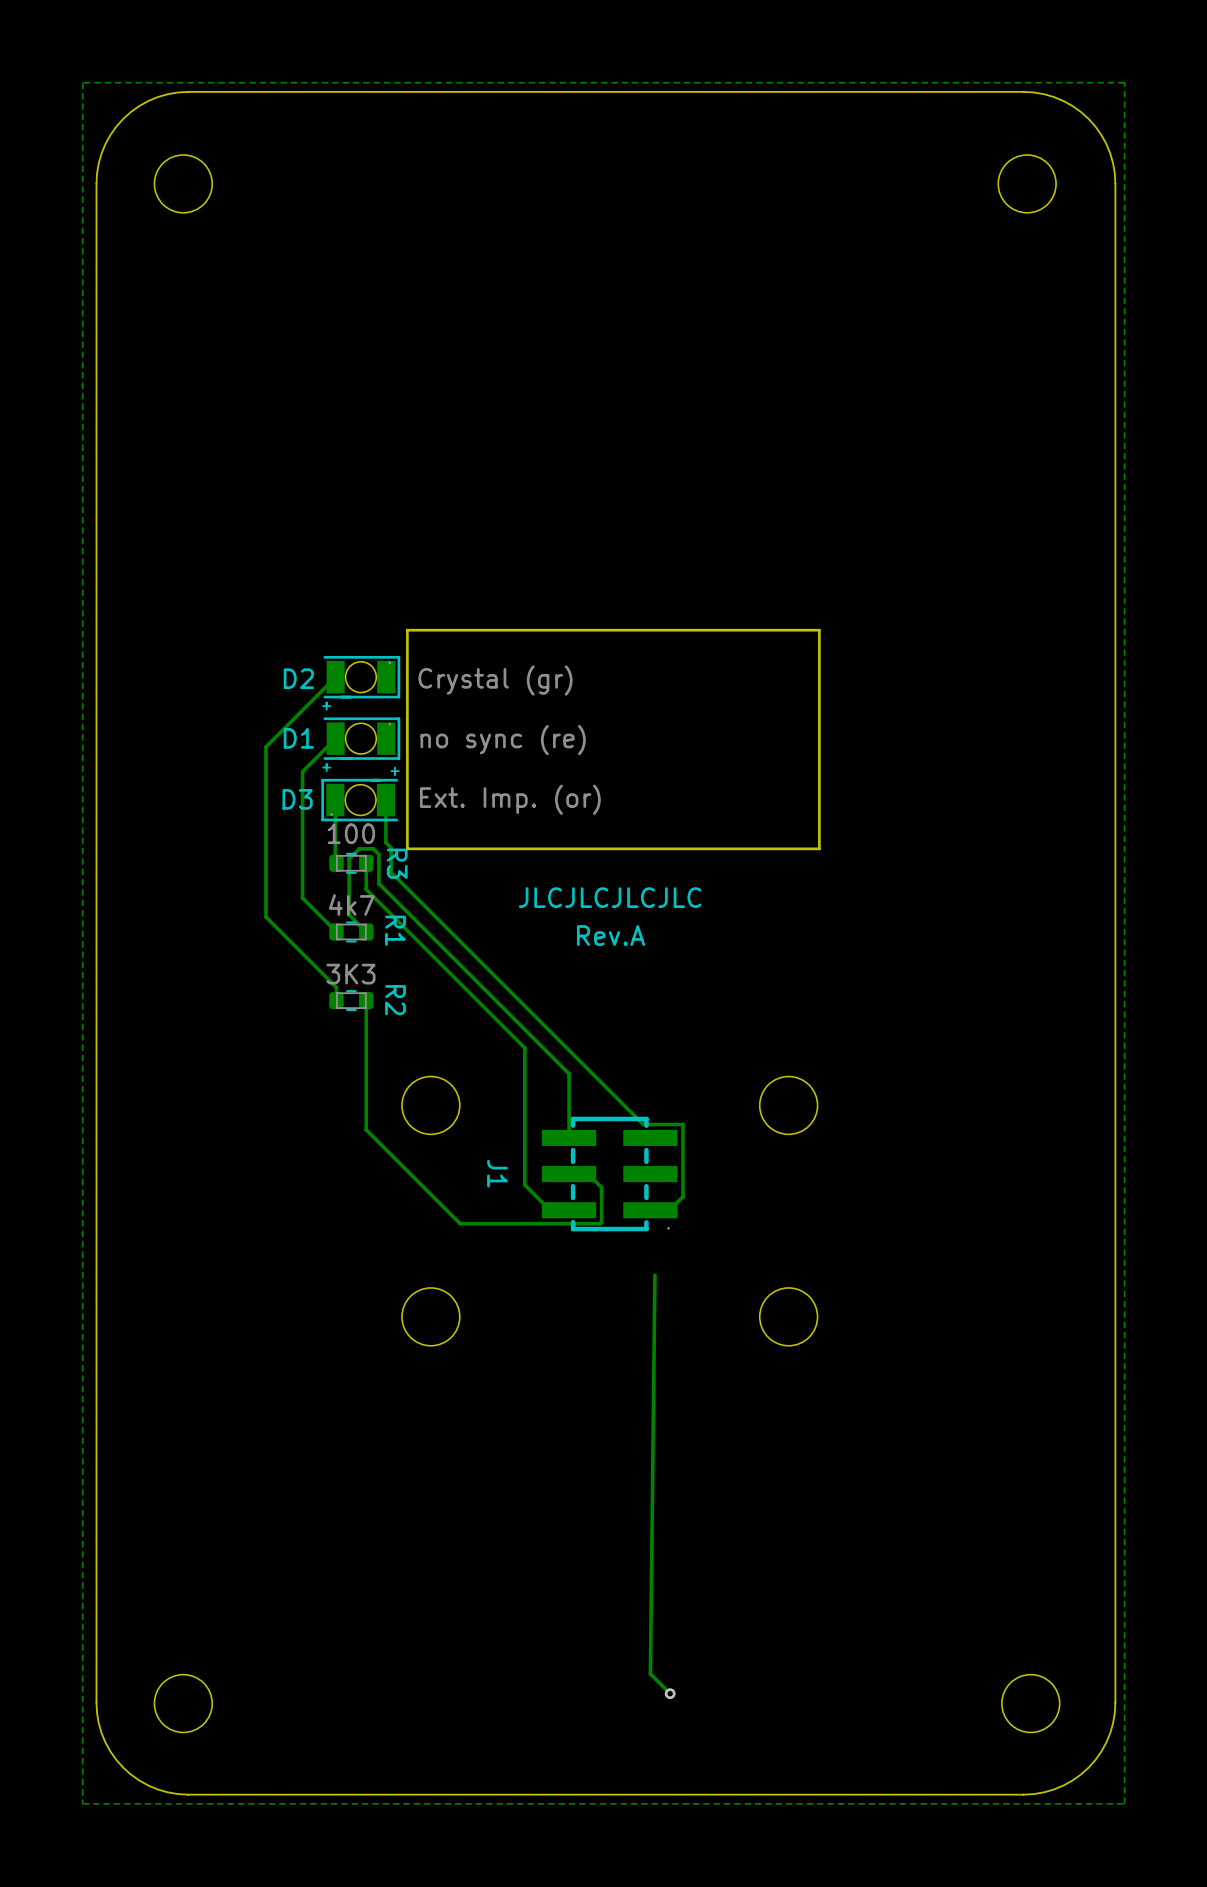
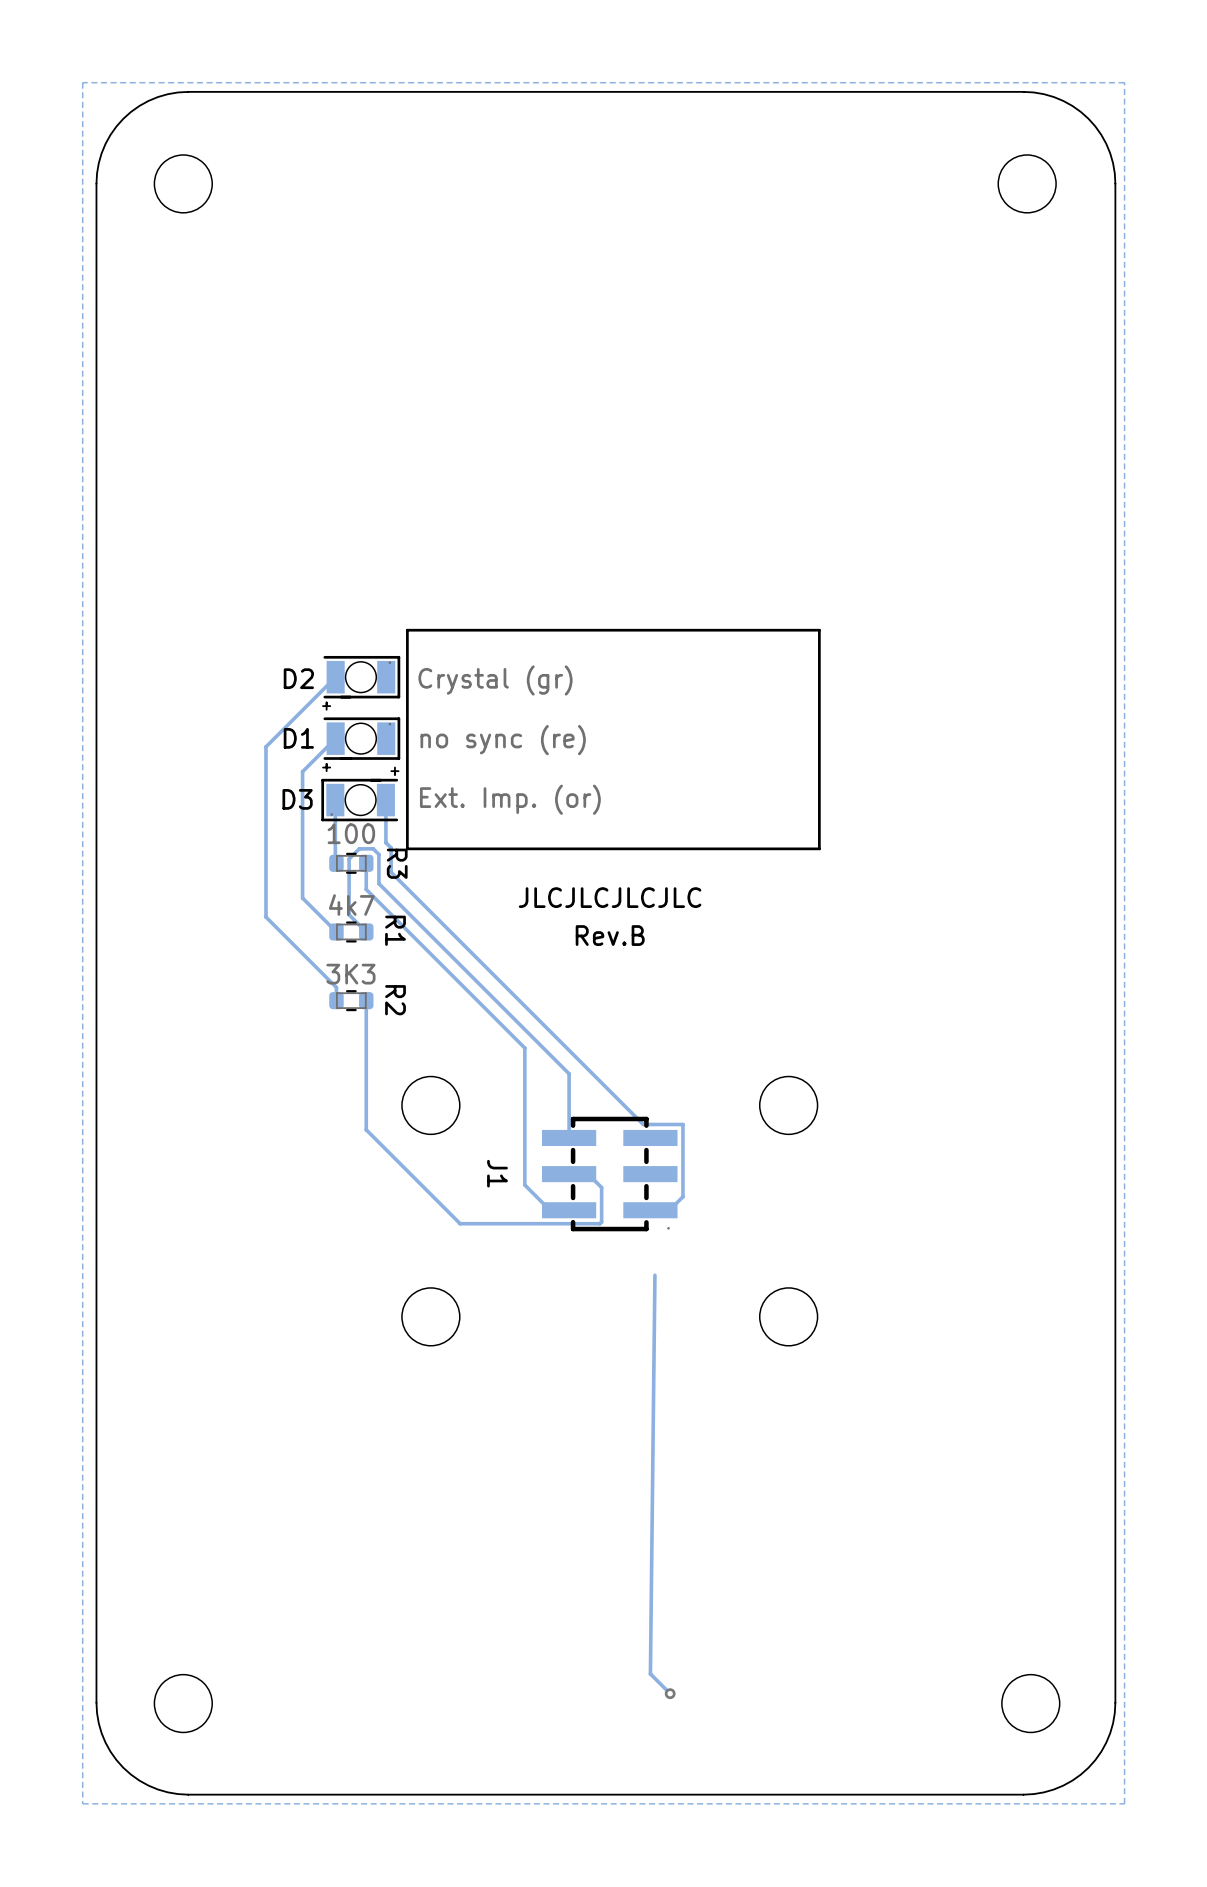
text: Rev.A (611, 935) -> Rev.B (610, 935)

